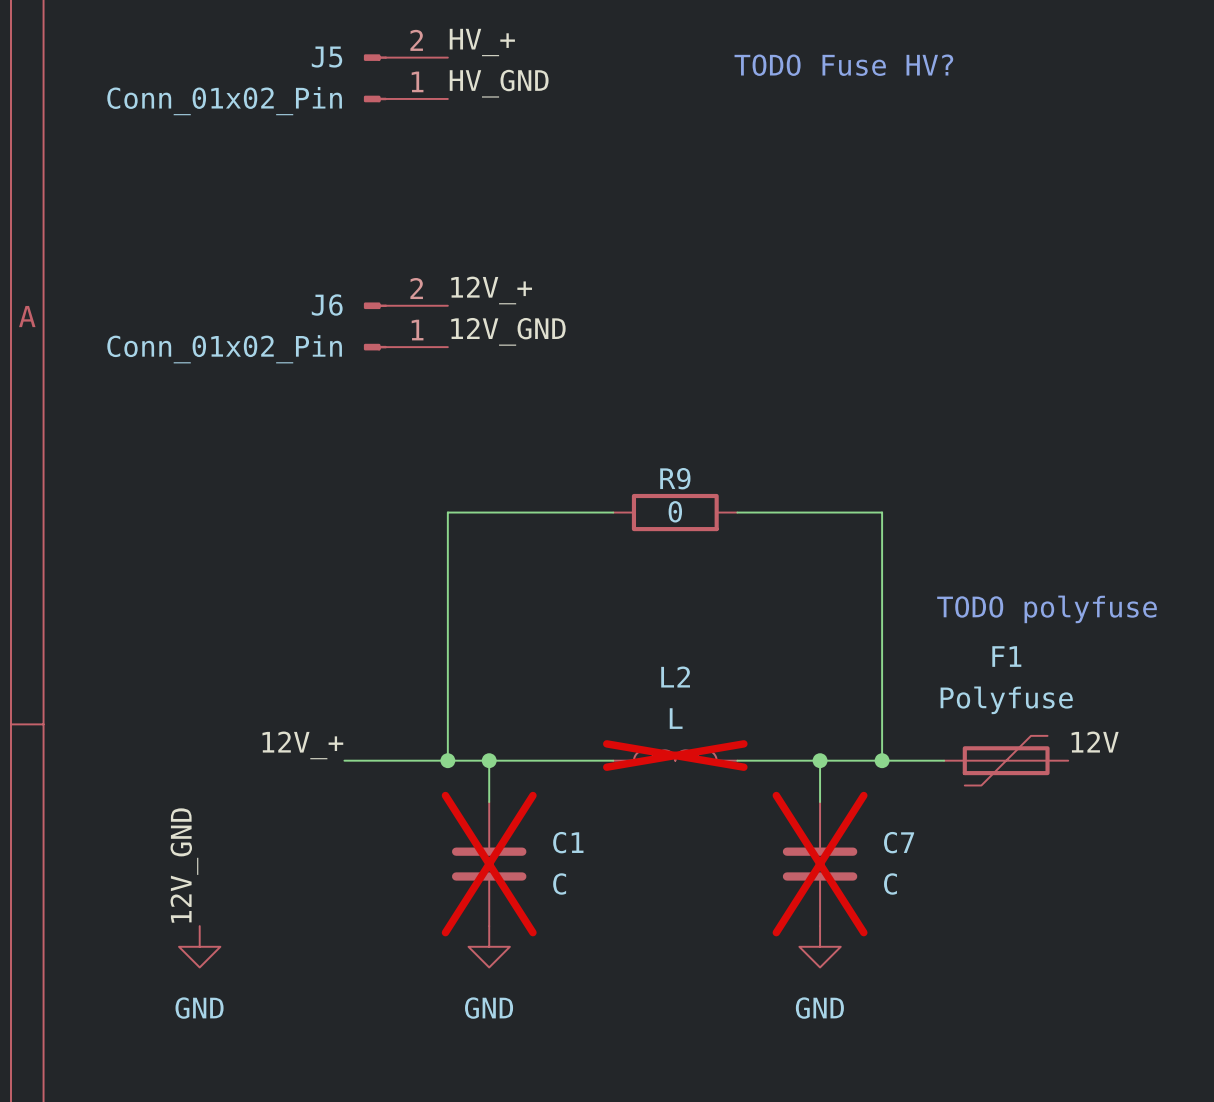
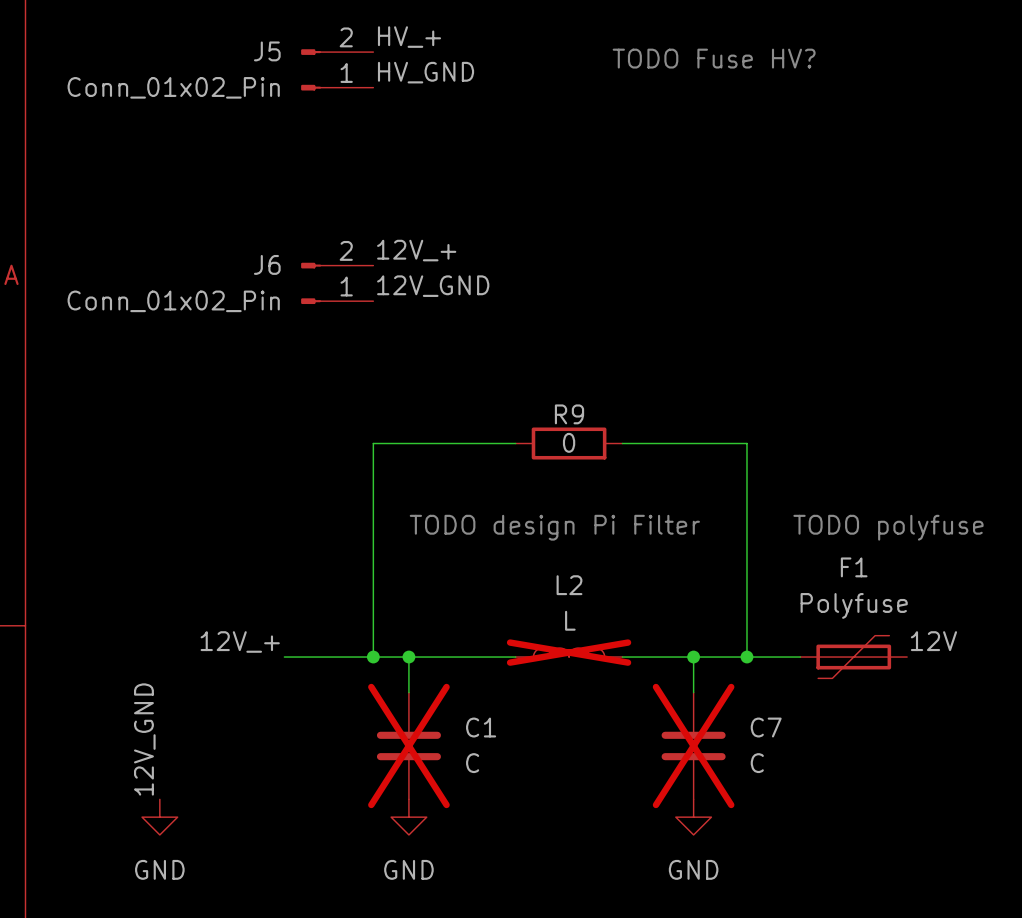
text: none -> TODO design Pi Filter (554, 527)

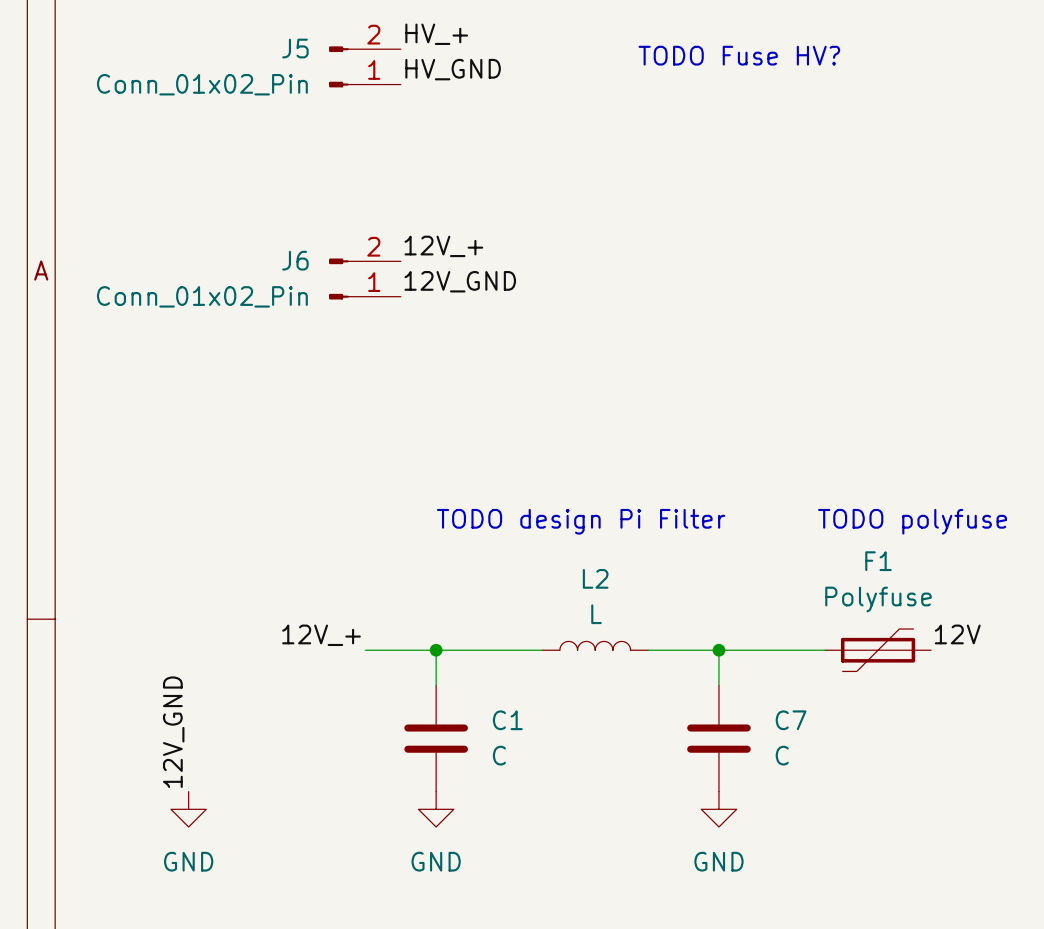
wire: (515, 443) (373, 443) (373, 657) -> none
R9: 0 (569, 443) -> none
wire: (622, 443) (746, 443) (746, 657) -> none
label position: 12V_+ (240, 641) -> 12V_+ (321, 635)
L2 do-not-place cross: (569, 652) -> none
wire: (284, 657) (337, 657) -> none
junction: (373, 657) -> none
junction: (746, 657) -> none
C1 do-not-place cross: (408, 745) -> none
C7 do-not-place cross: (693, 745) -> none

